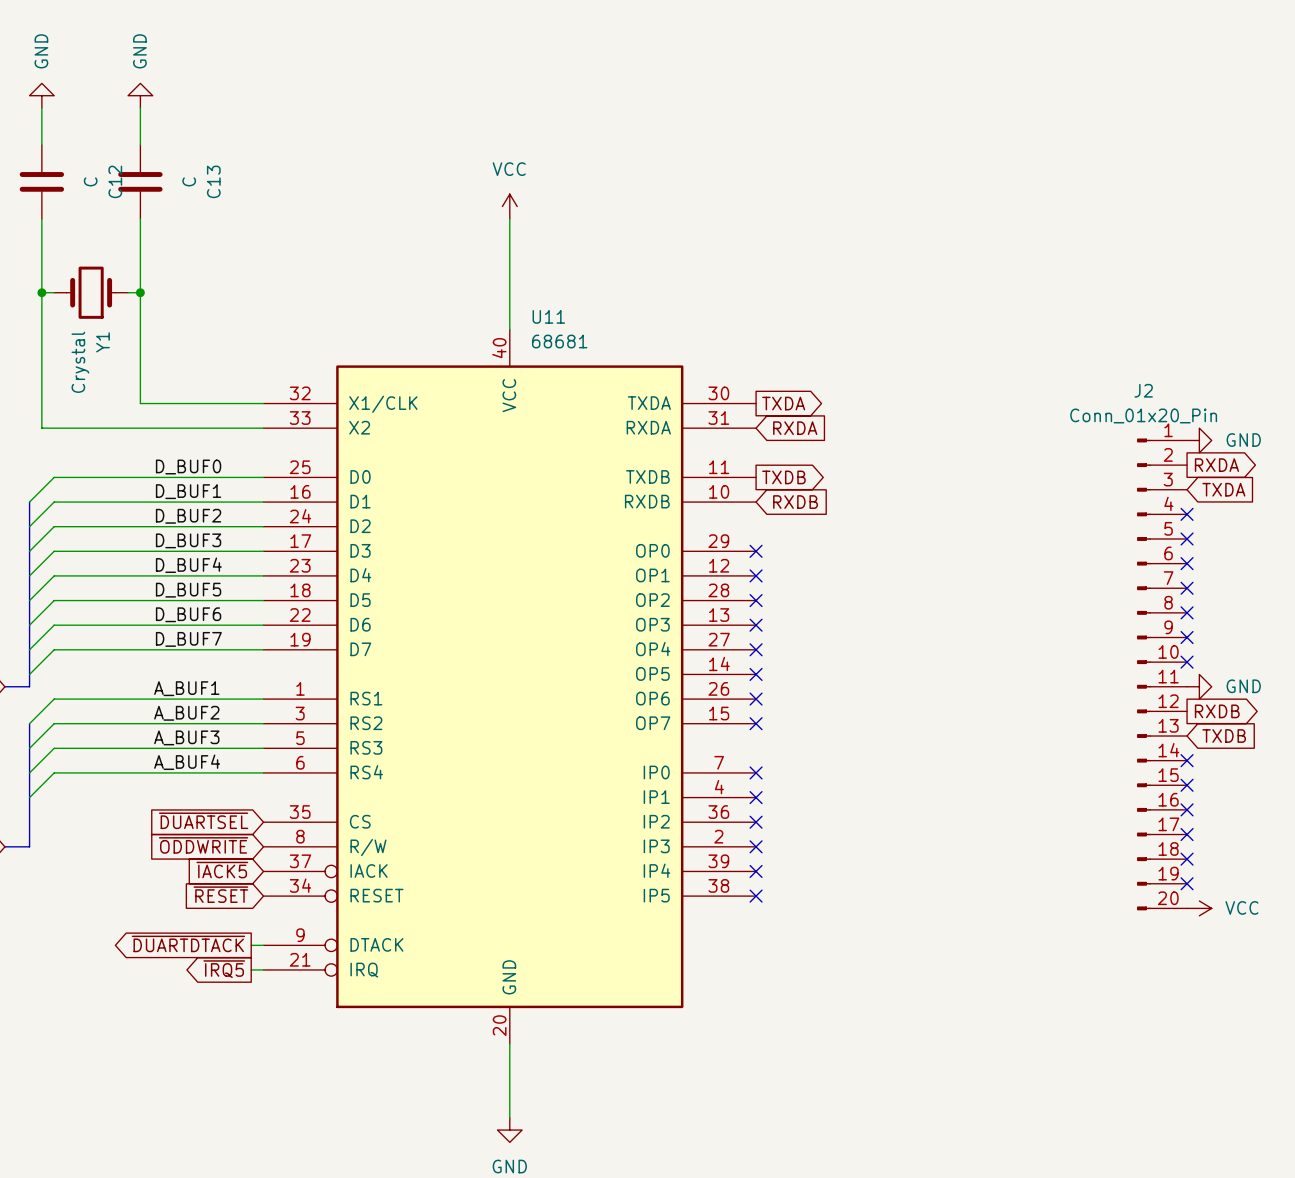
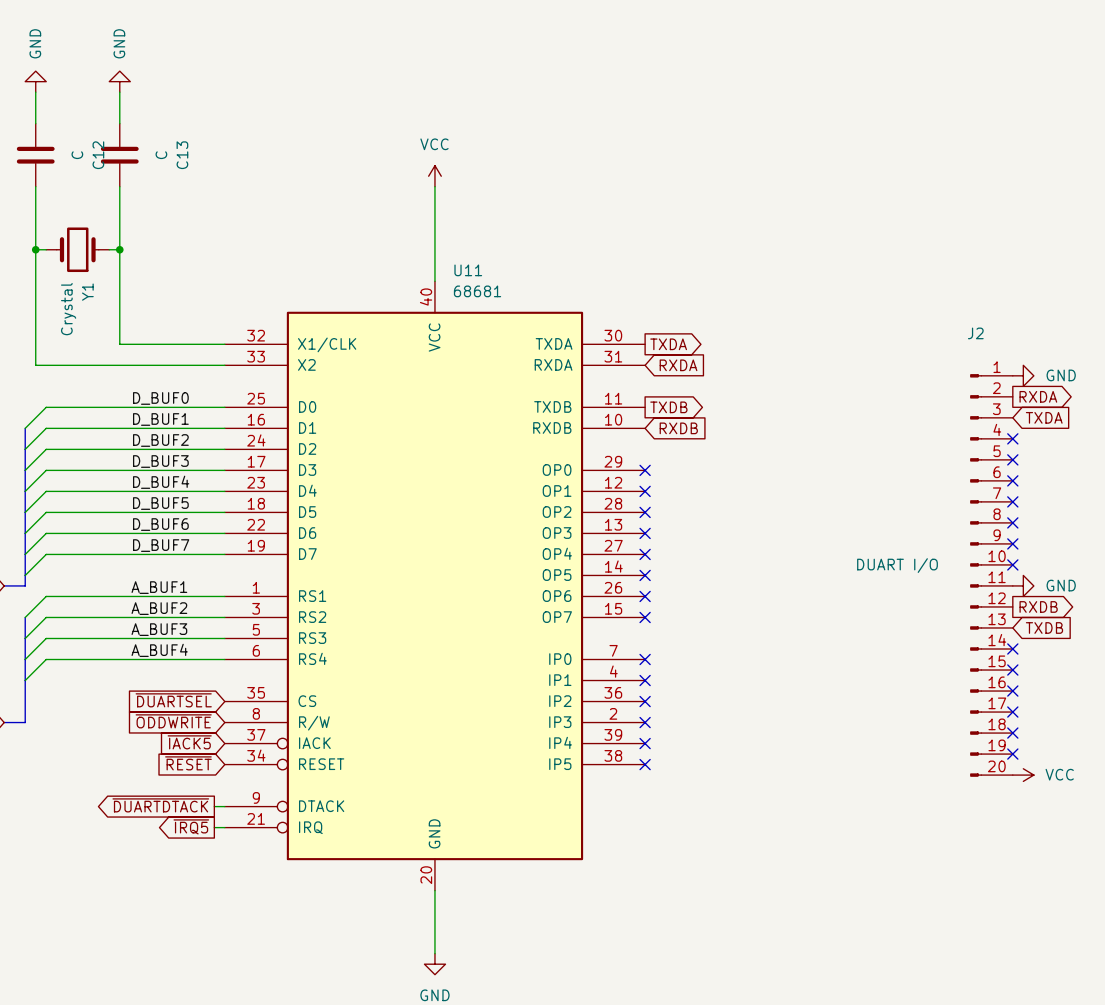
J2 value: Conn_01x20_Pin (1143, 415) -> DUART I/O (897, 565)

